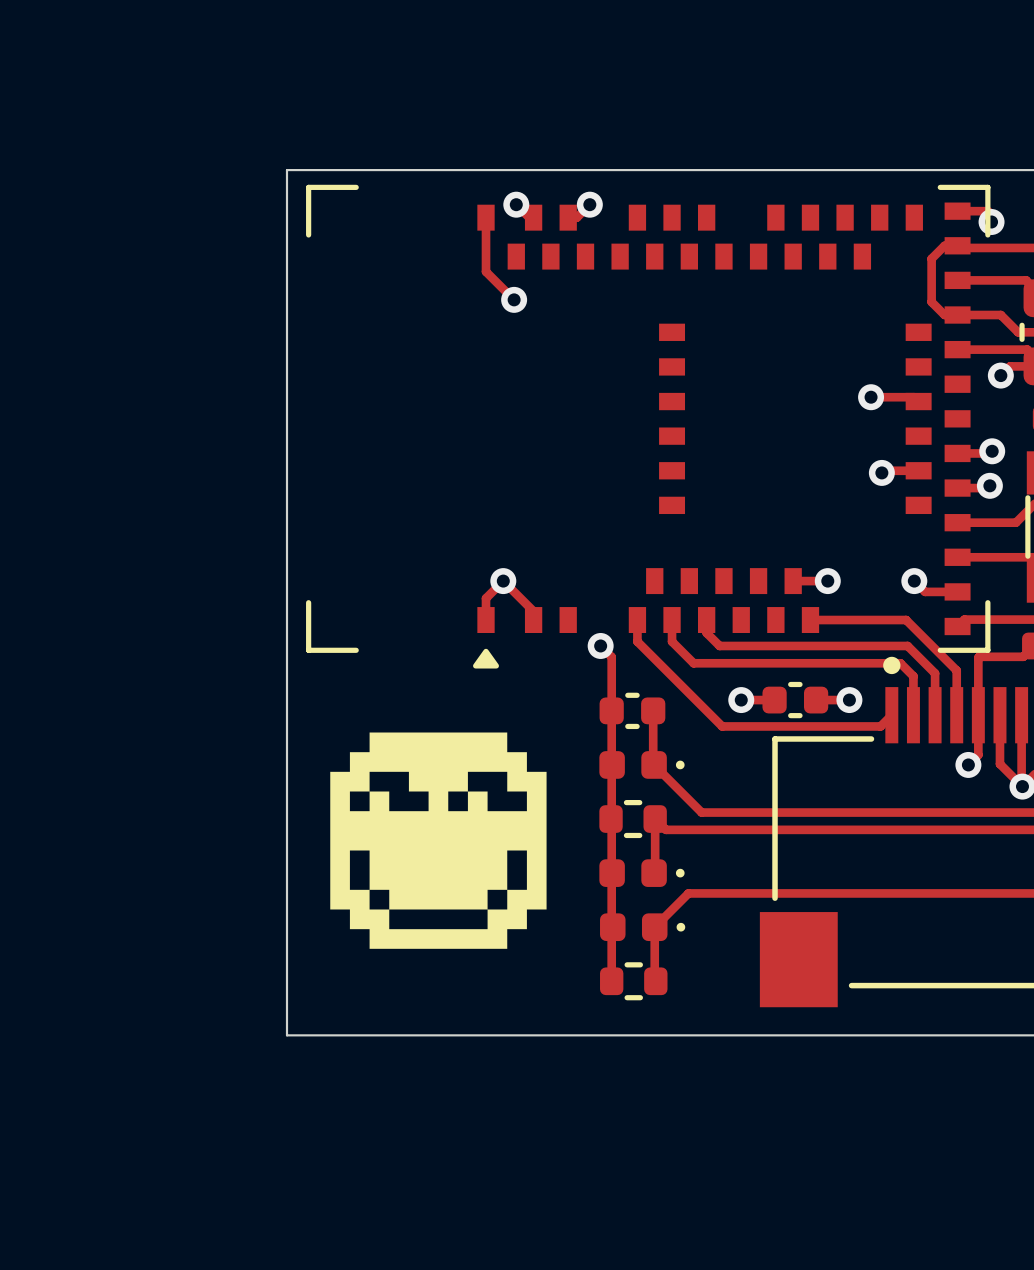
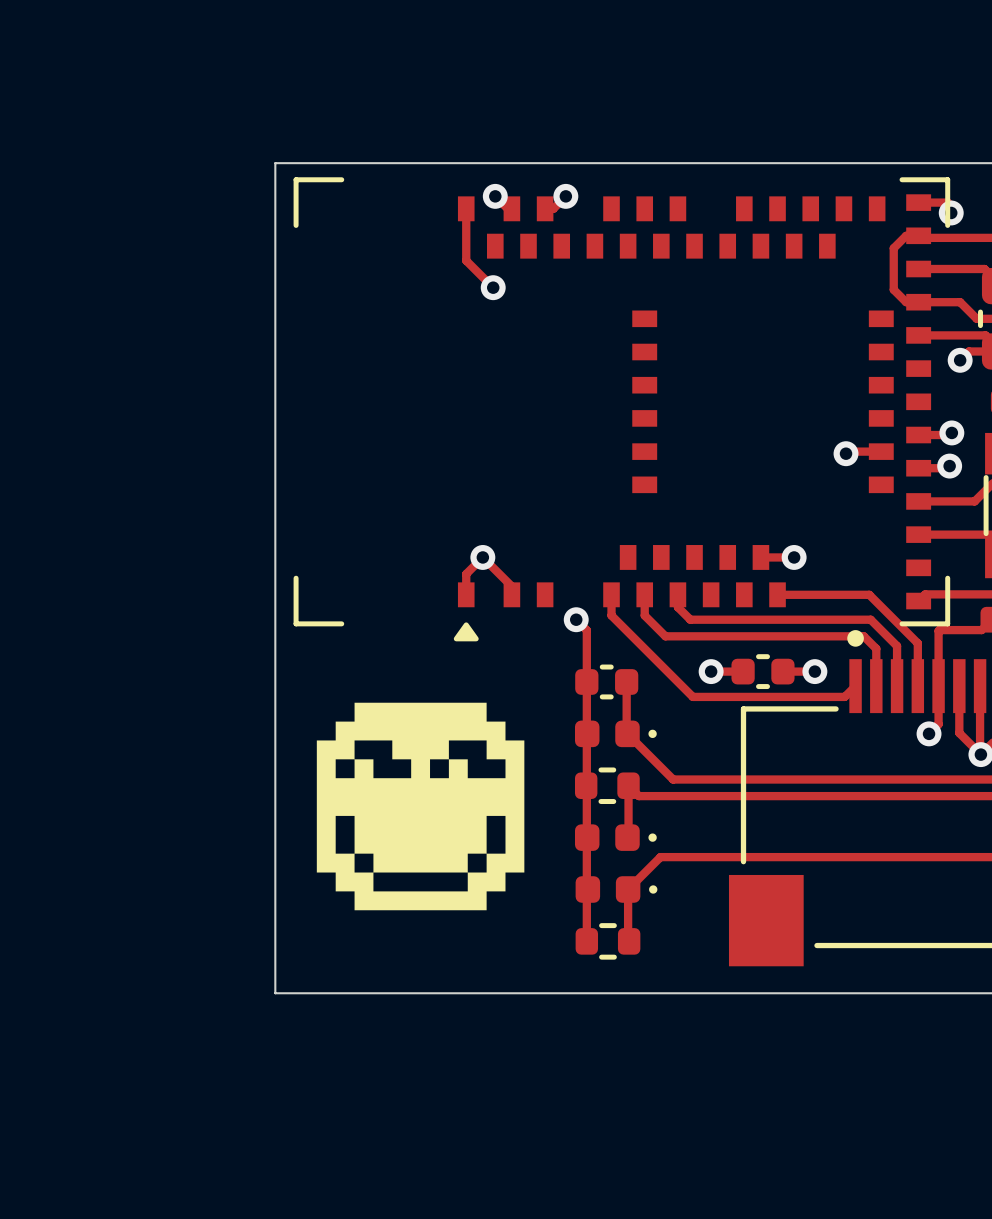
track: (871, 397) (914, 397) (918, 401) -> none
via: (871, 397) -> none
track: (914, 581) (925, 591) (957, 591) -> none
via: (914, 581) -> none

